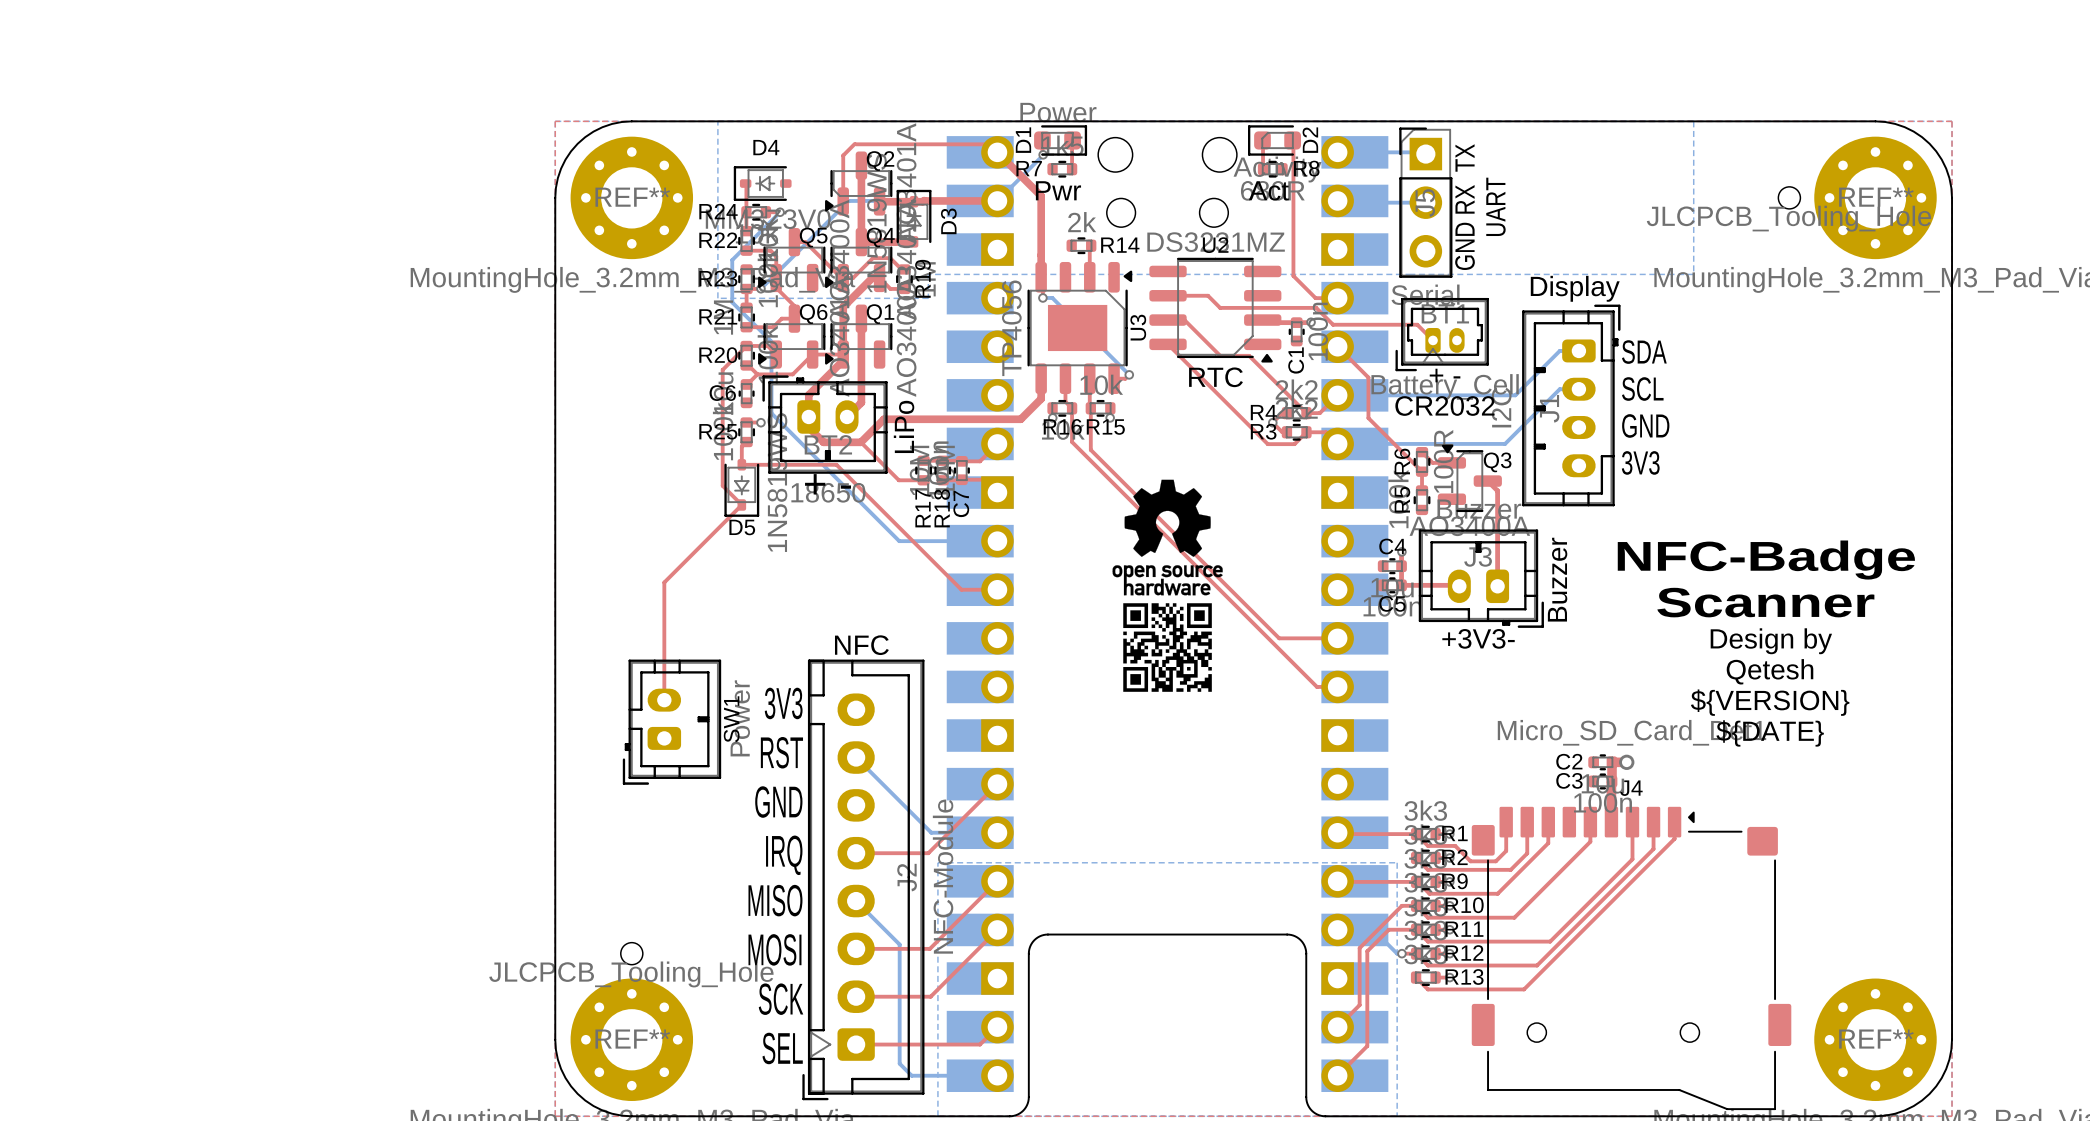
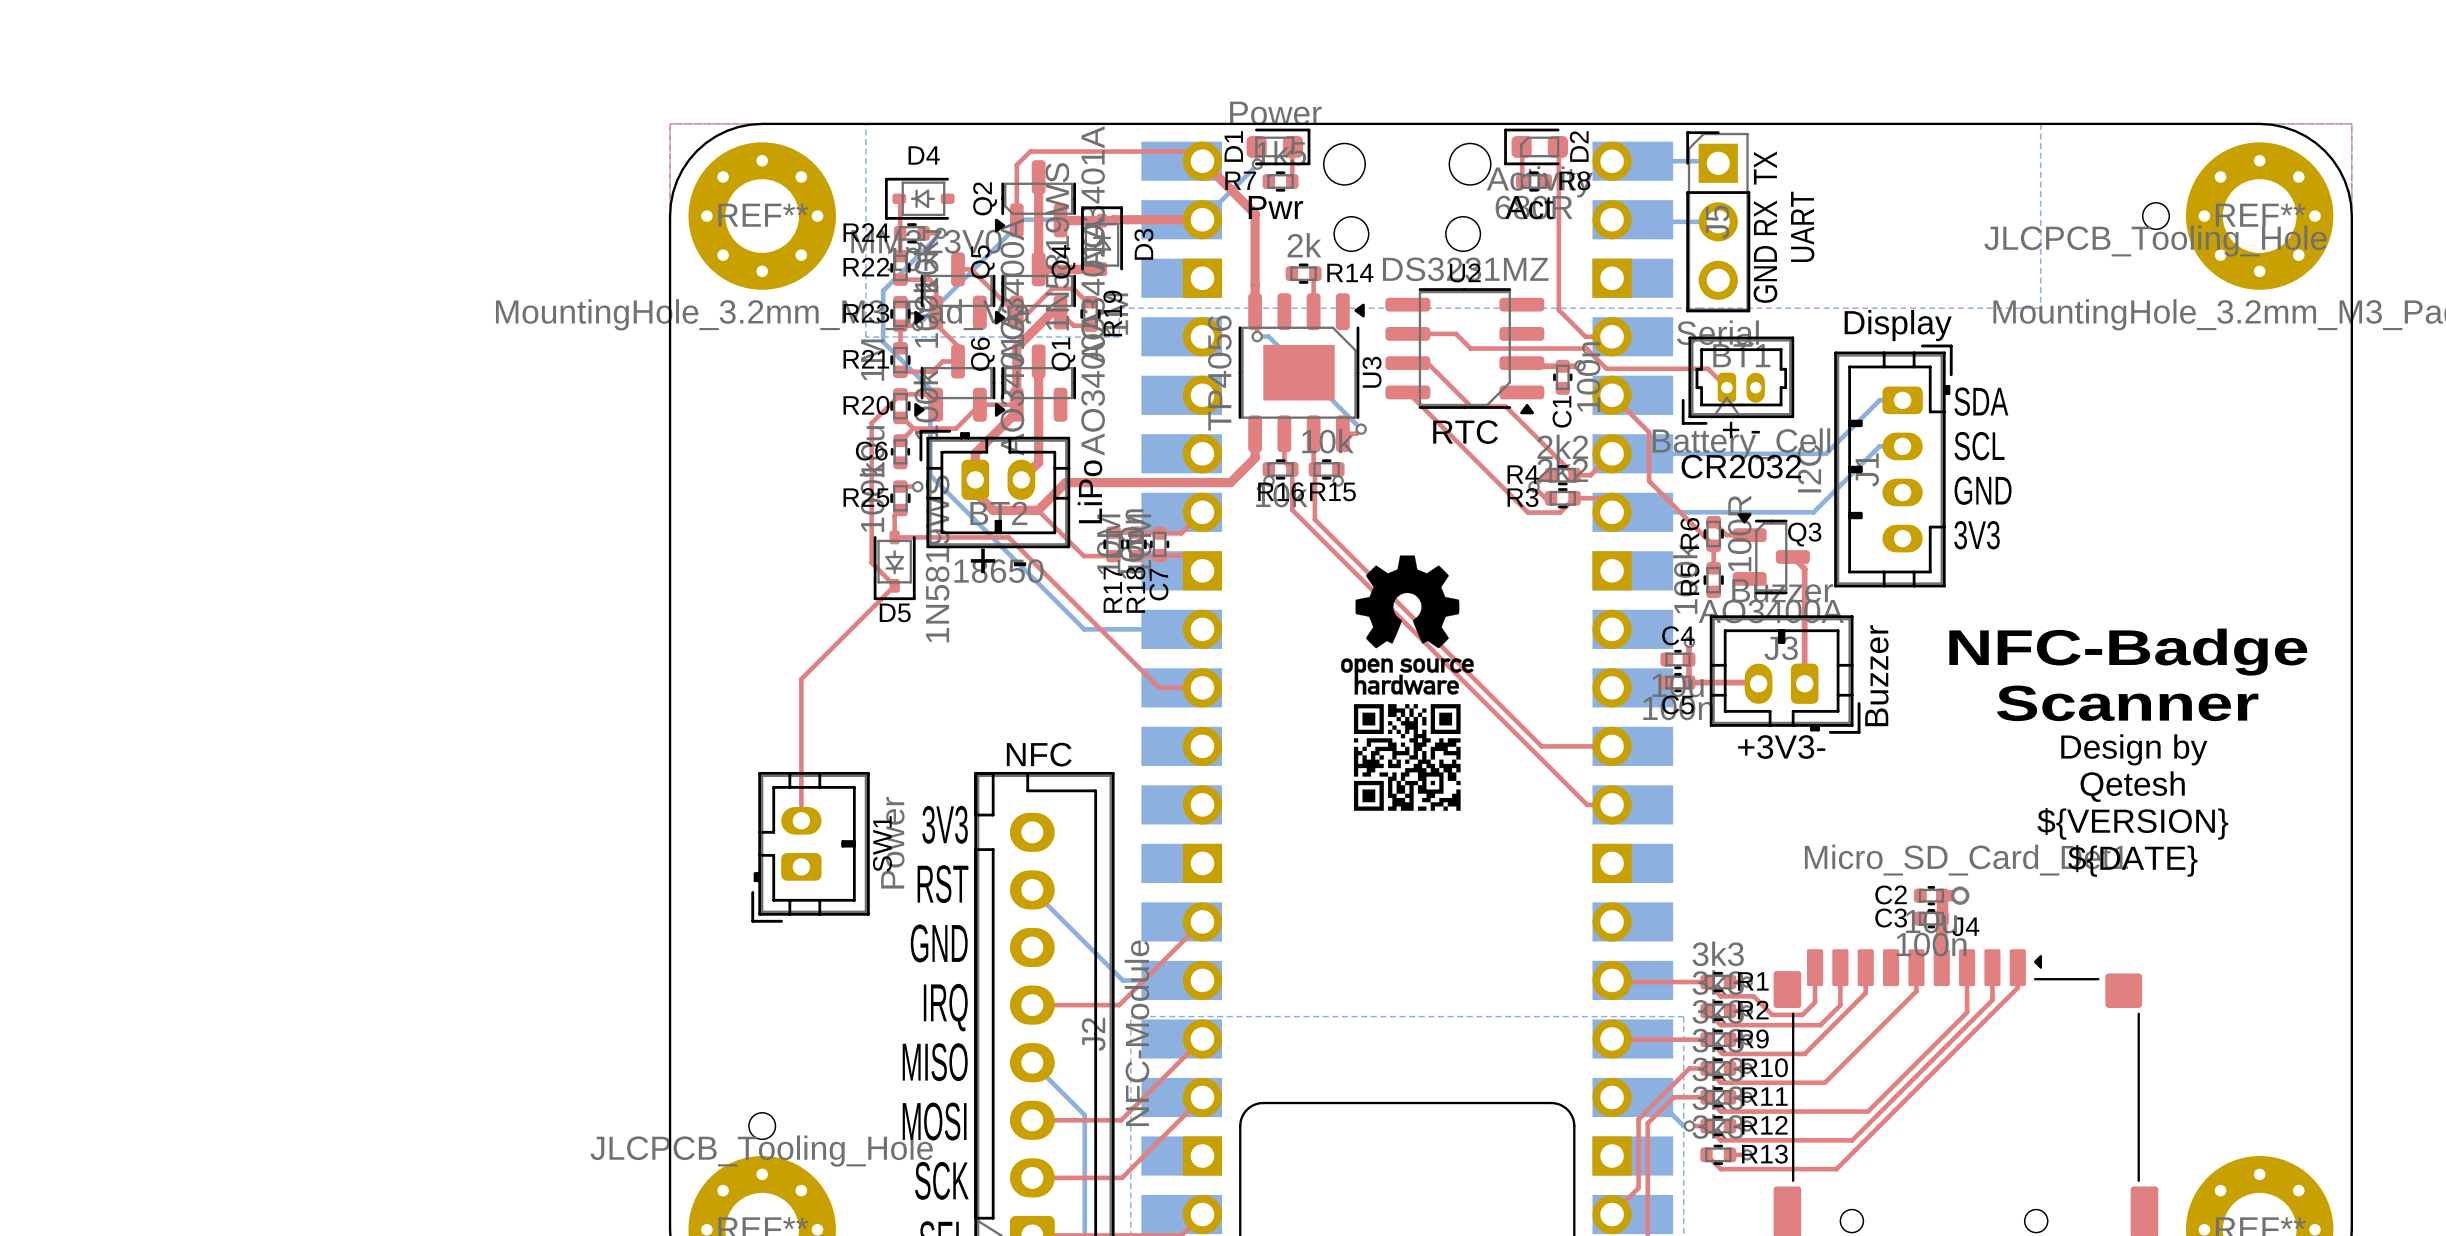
Q2 name rotation: 0° (880, 161) -> 90° counterclockwise (985, 198)
Q2 name position: Q2 (880, 161) -> Q2 (985, 198)
Q5 name rotation: 0° (813, 237) -> 90° counterclockwise (982, 262)
Q4 name rotation: 0° (880, 237) -> 90° counterclockwise (1063, 261)
Q6 name rotation: 0° (813, 314) -> 90° counterclockwise (982, 354)
Q1 name rotation: 0° (880, 314) -> 90° counterclockwise (1063, 354)

